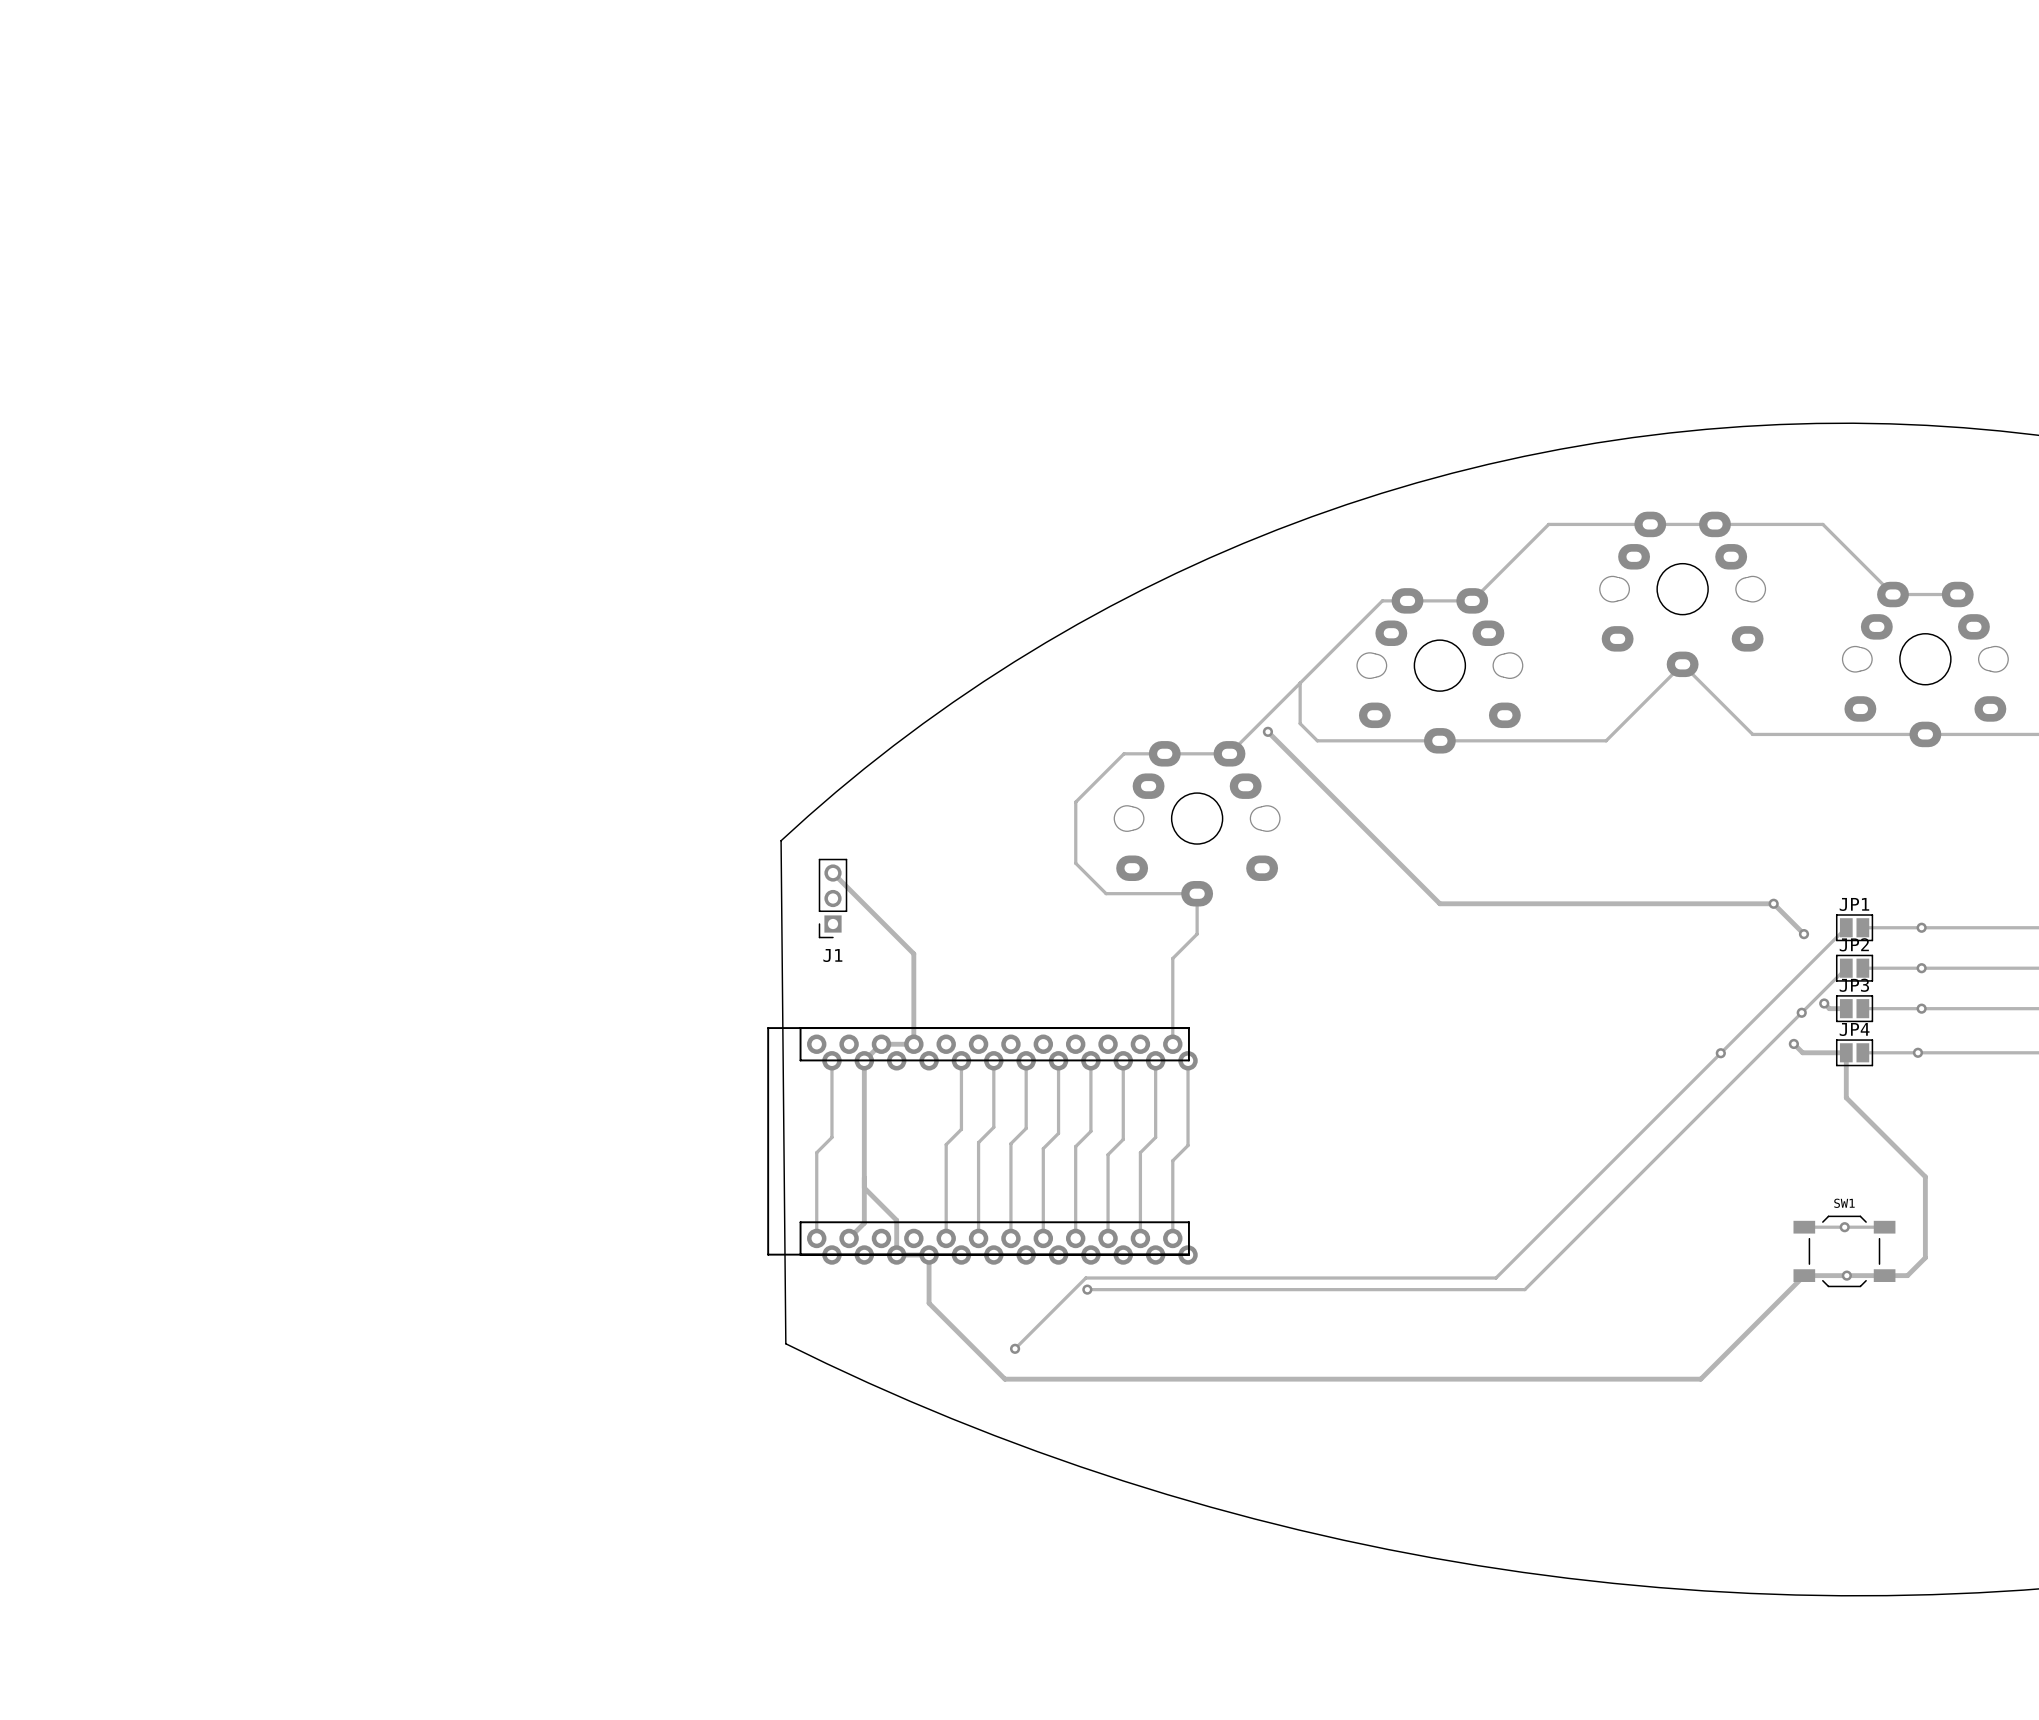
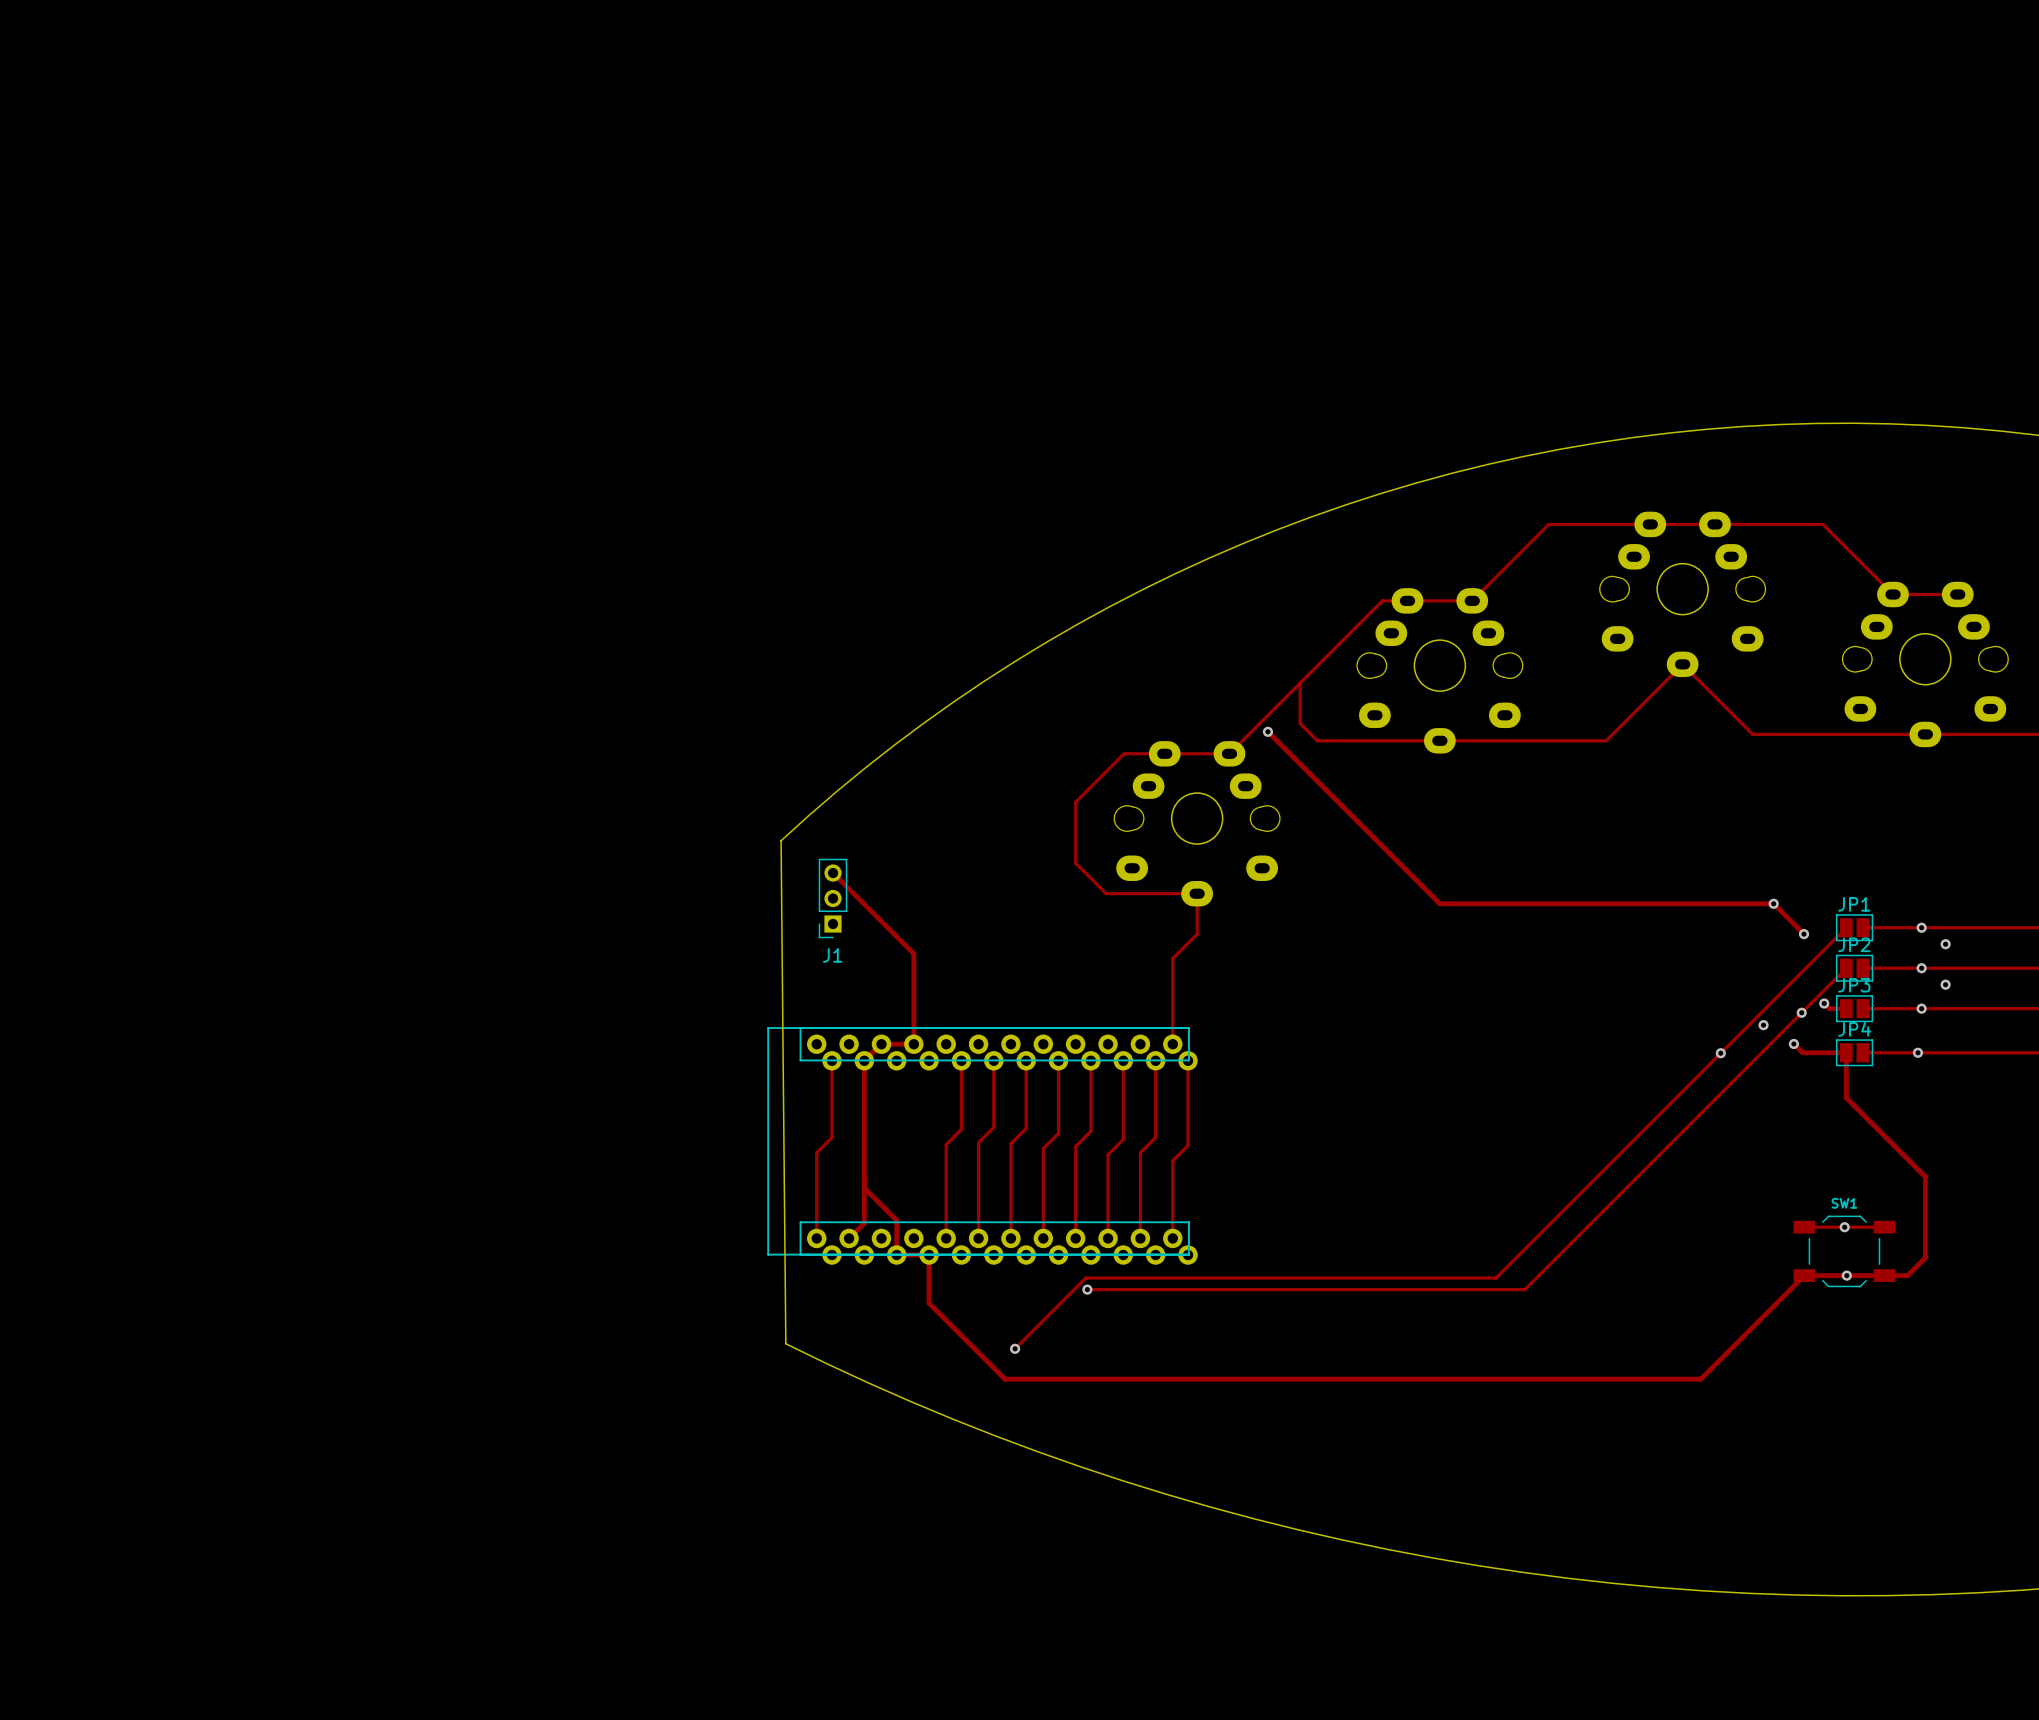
via: none -> (1945, 944)
via: none -> (1945, 984)
via: none -> (1763, 1025)

